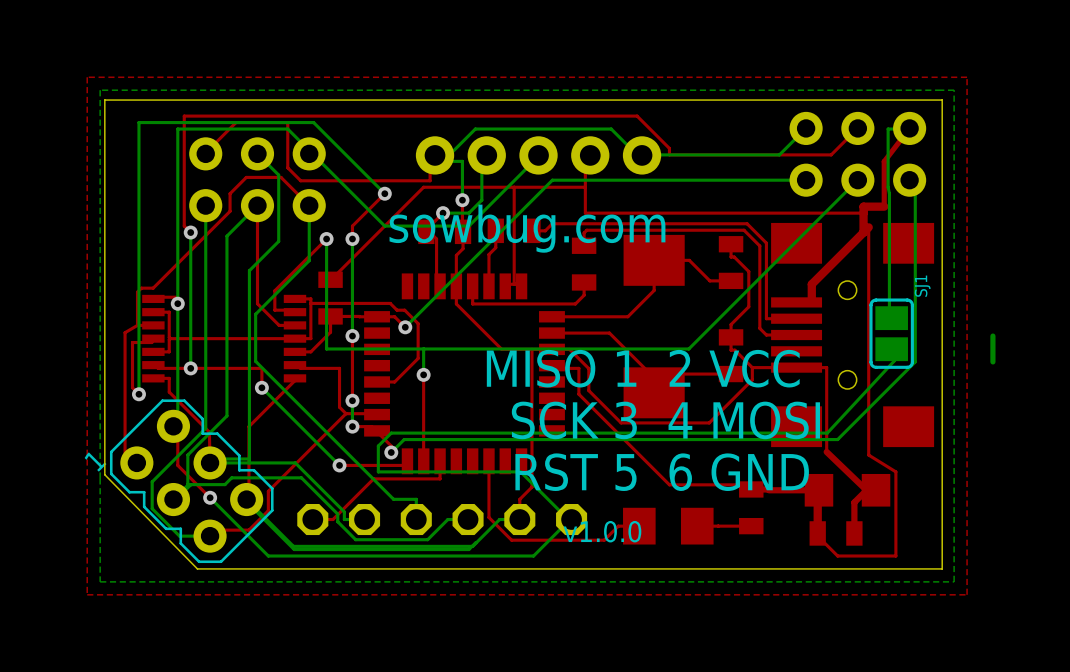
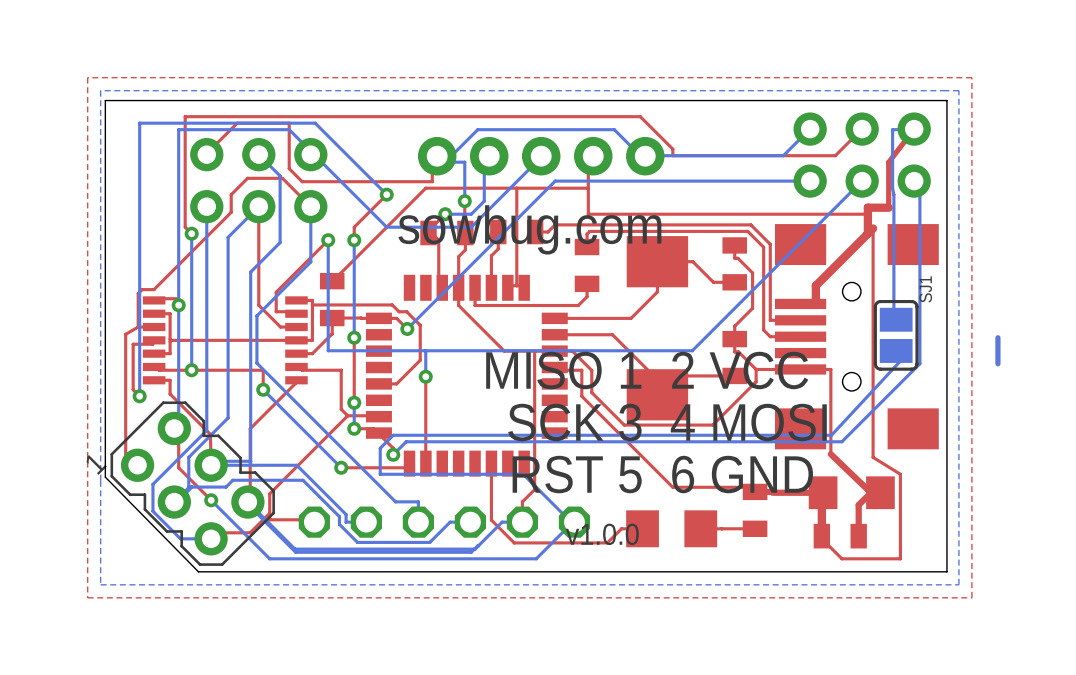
top track: (440, 461) (440, 478) (373, 478) (332, 519) (312, 519) -> (269, 513) (269, 519) (308, 519) (314, 522)

